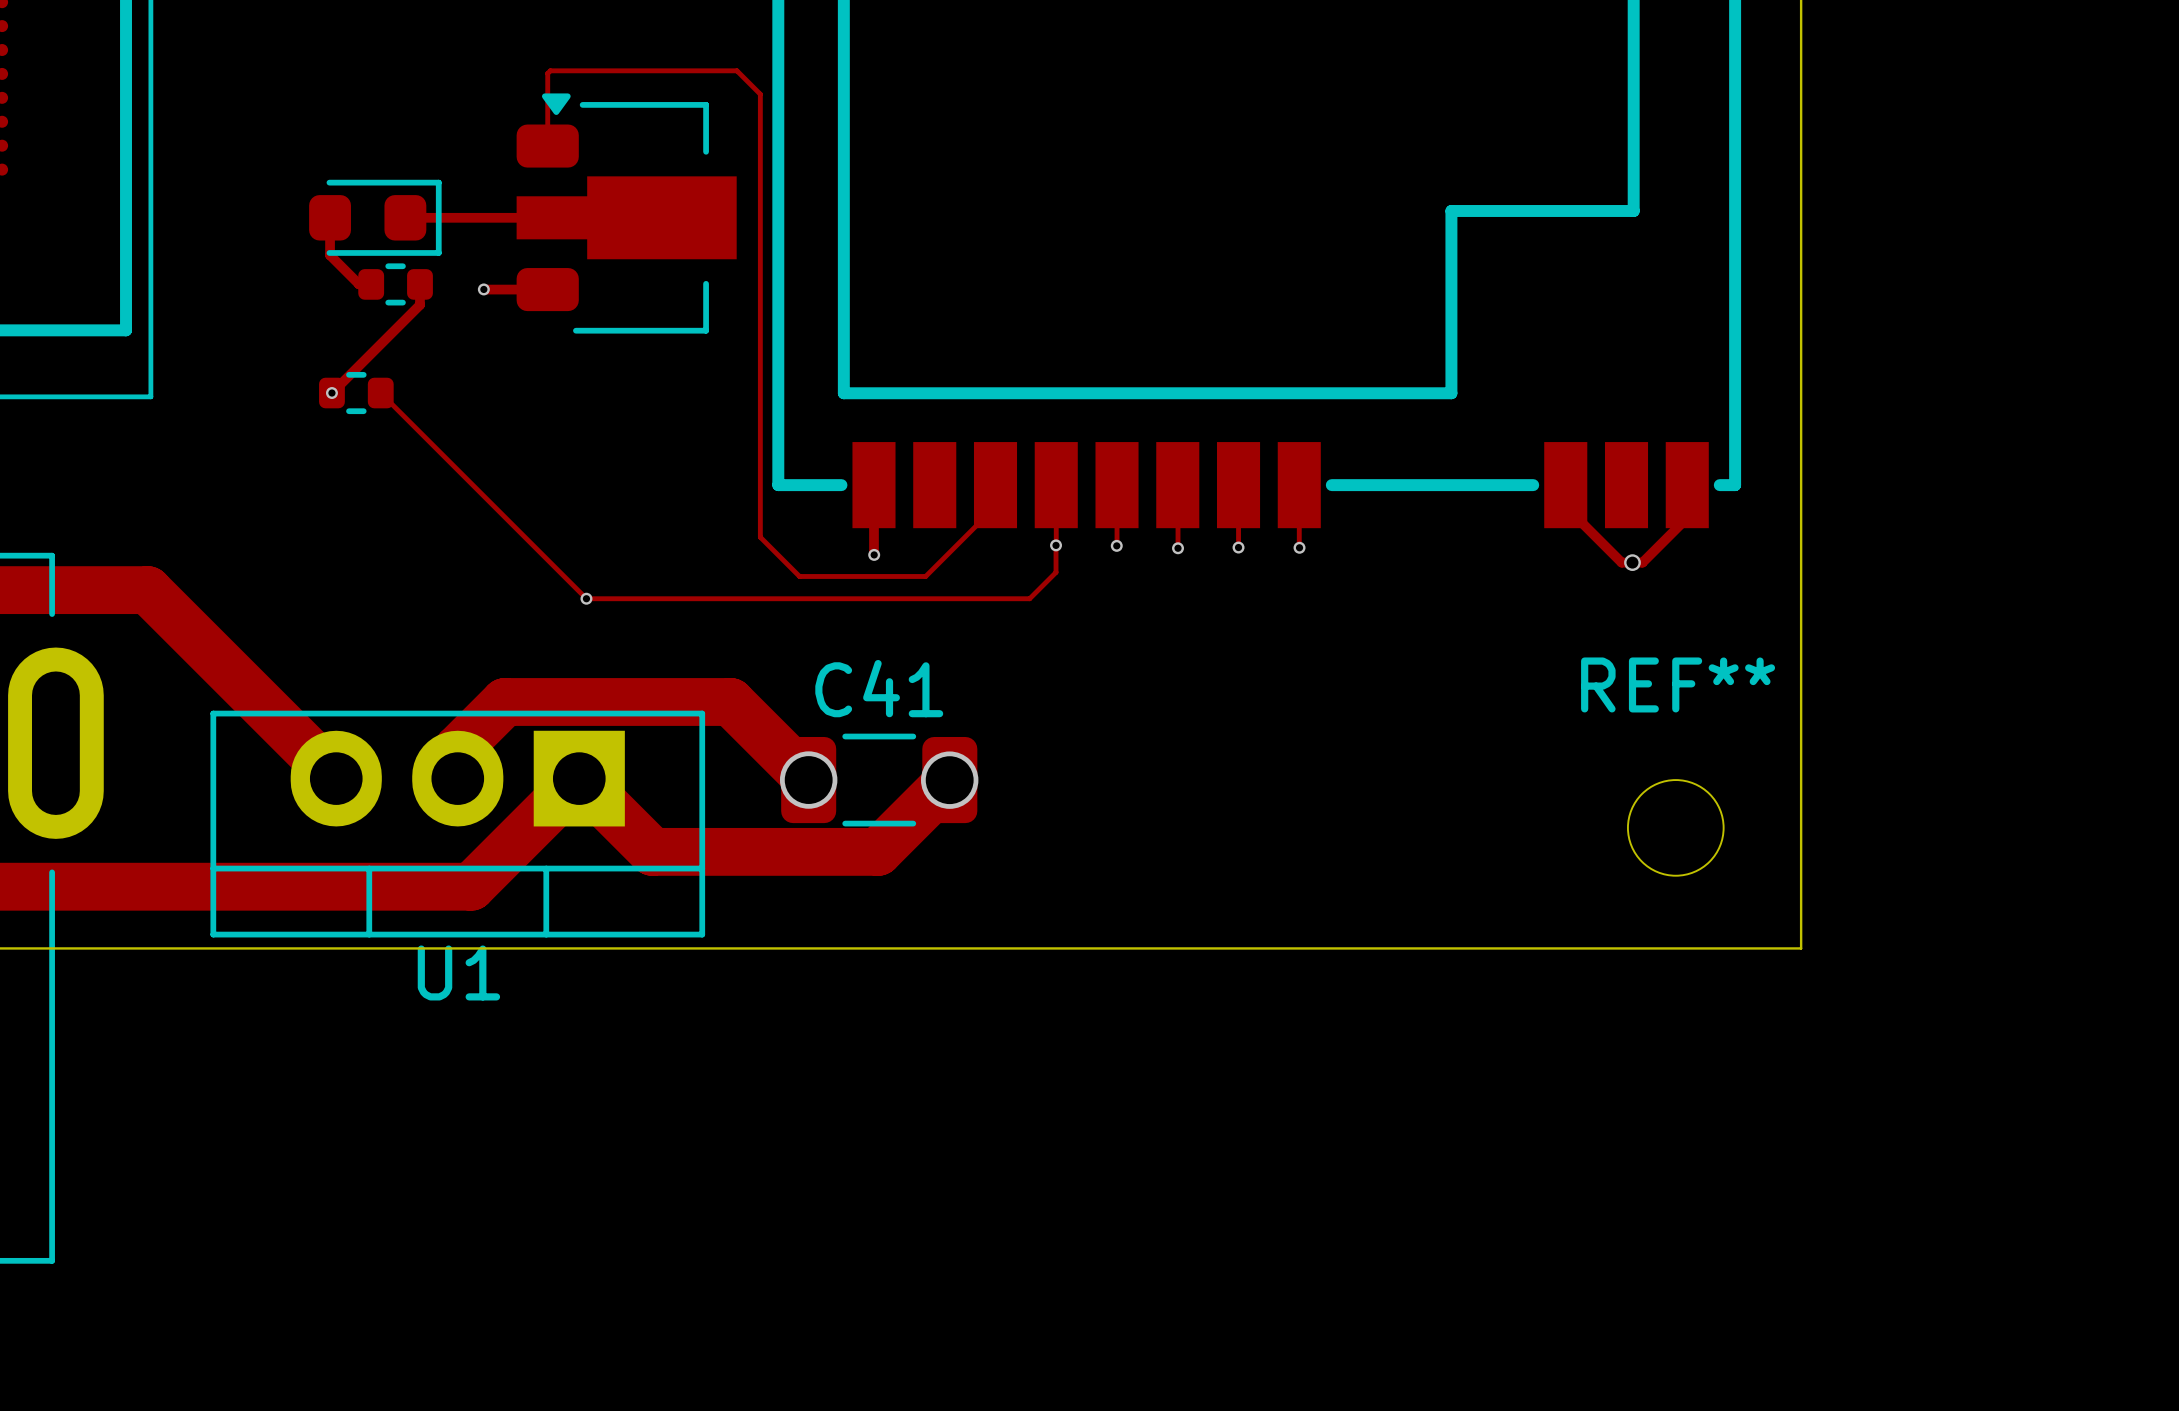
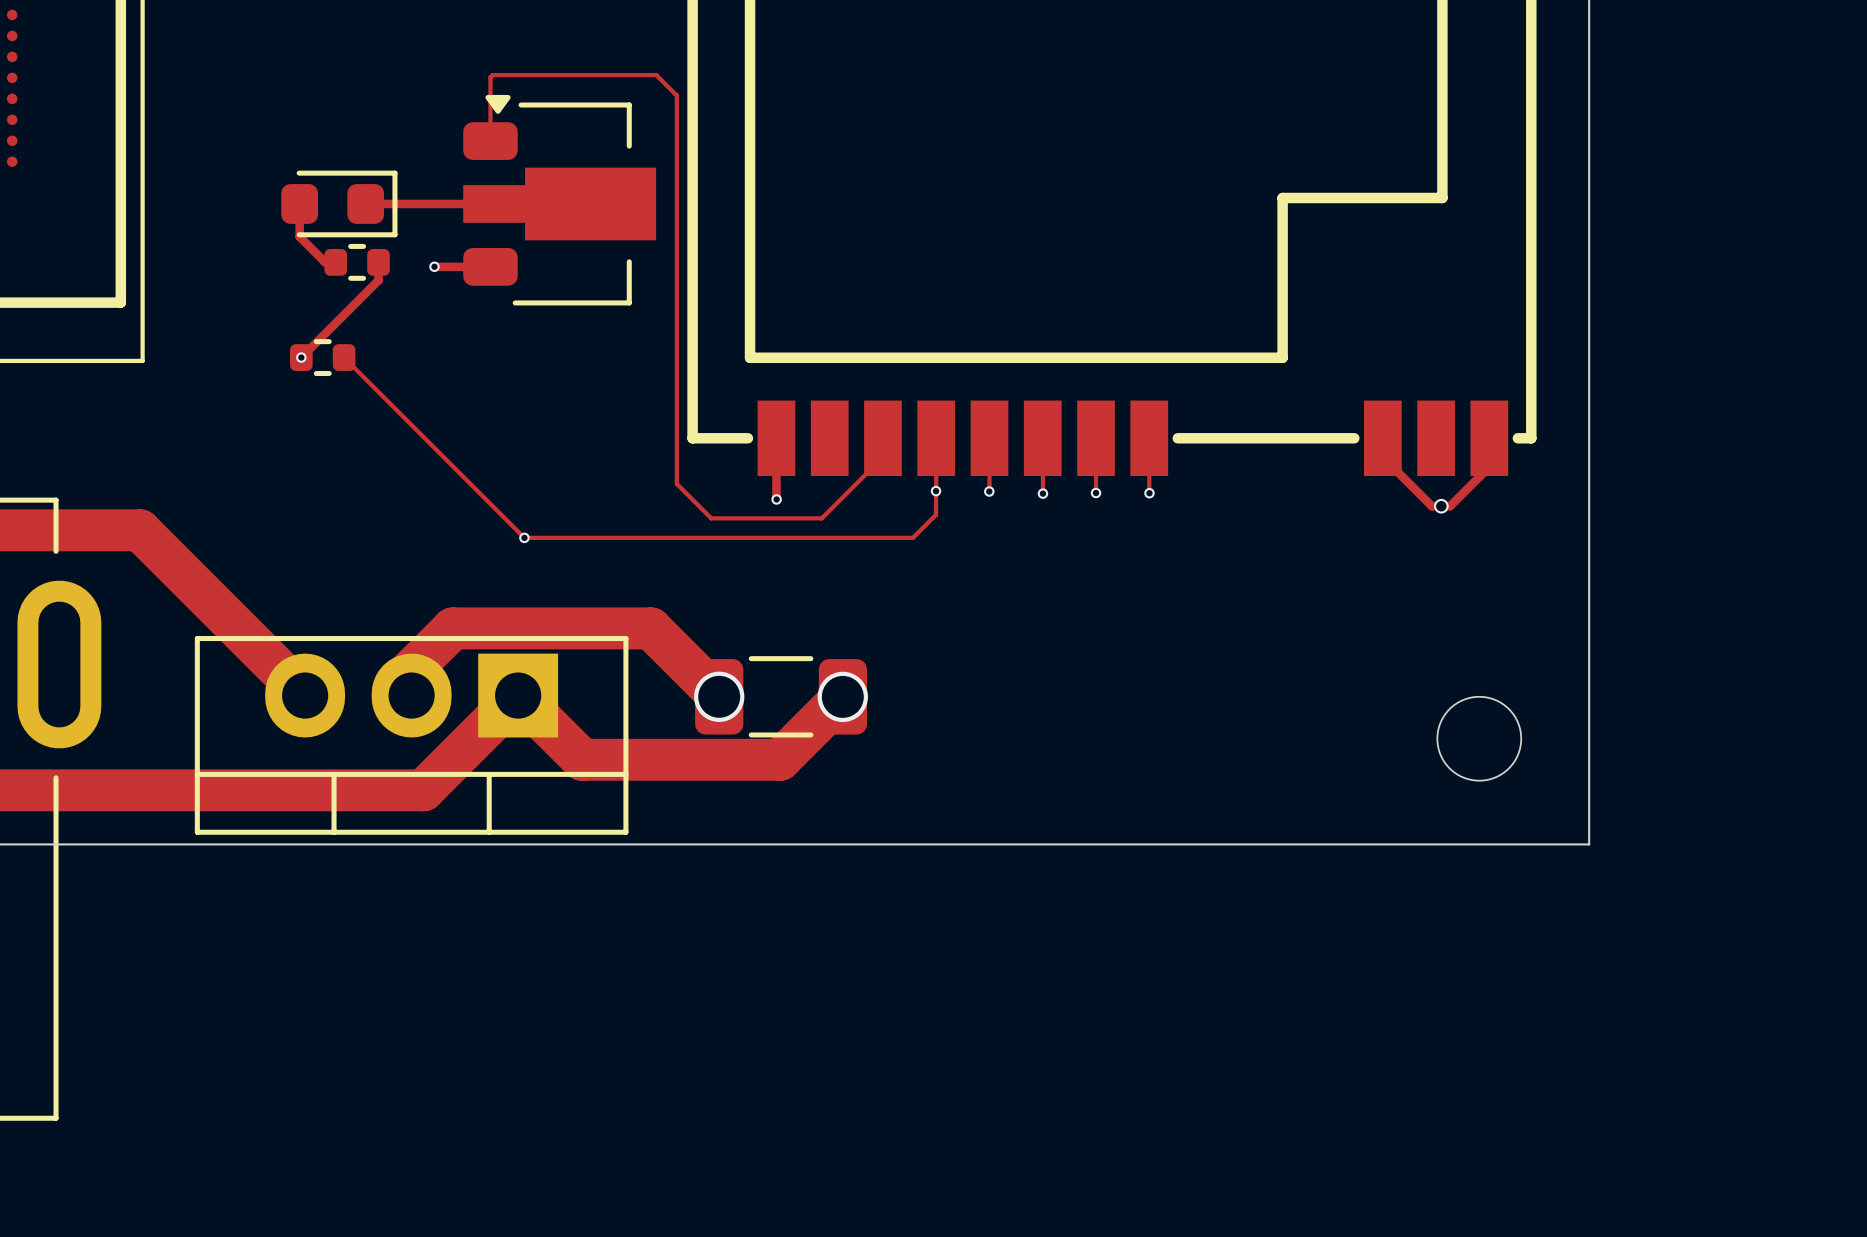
REF** name: REF** (1678, 684) -> none
C41 name: C41 (879, 688) -> none
U1 name: U1 (458, 972) -> none

